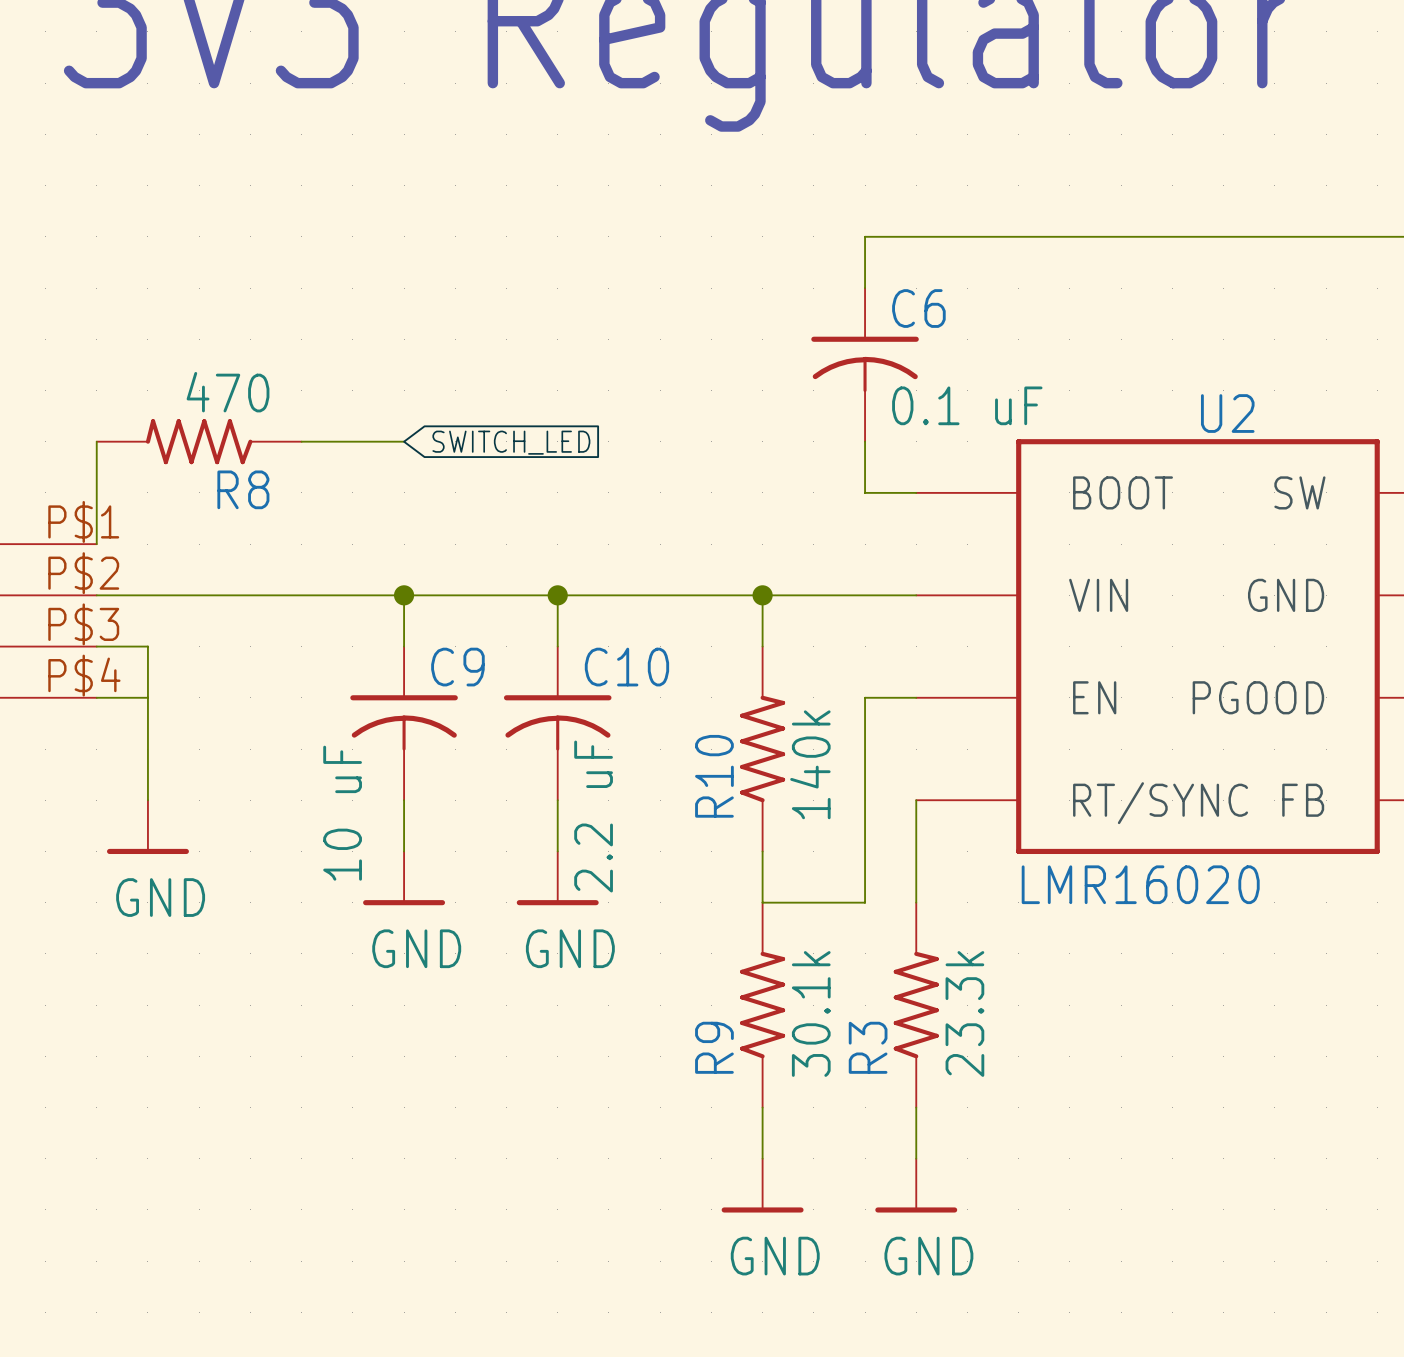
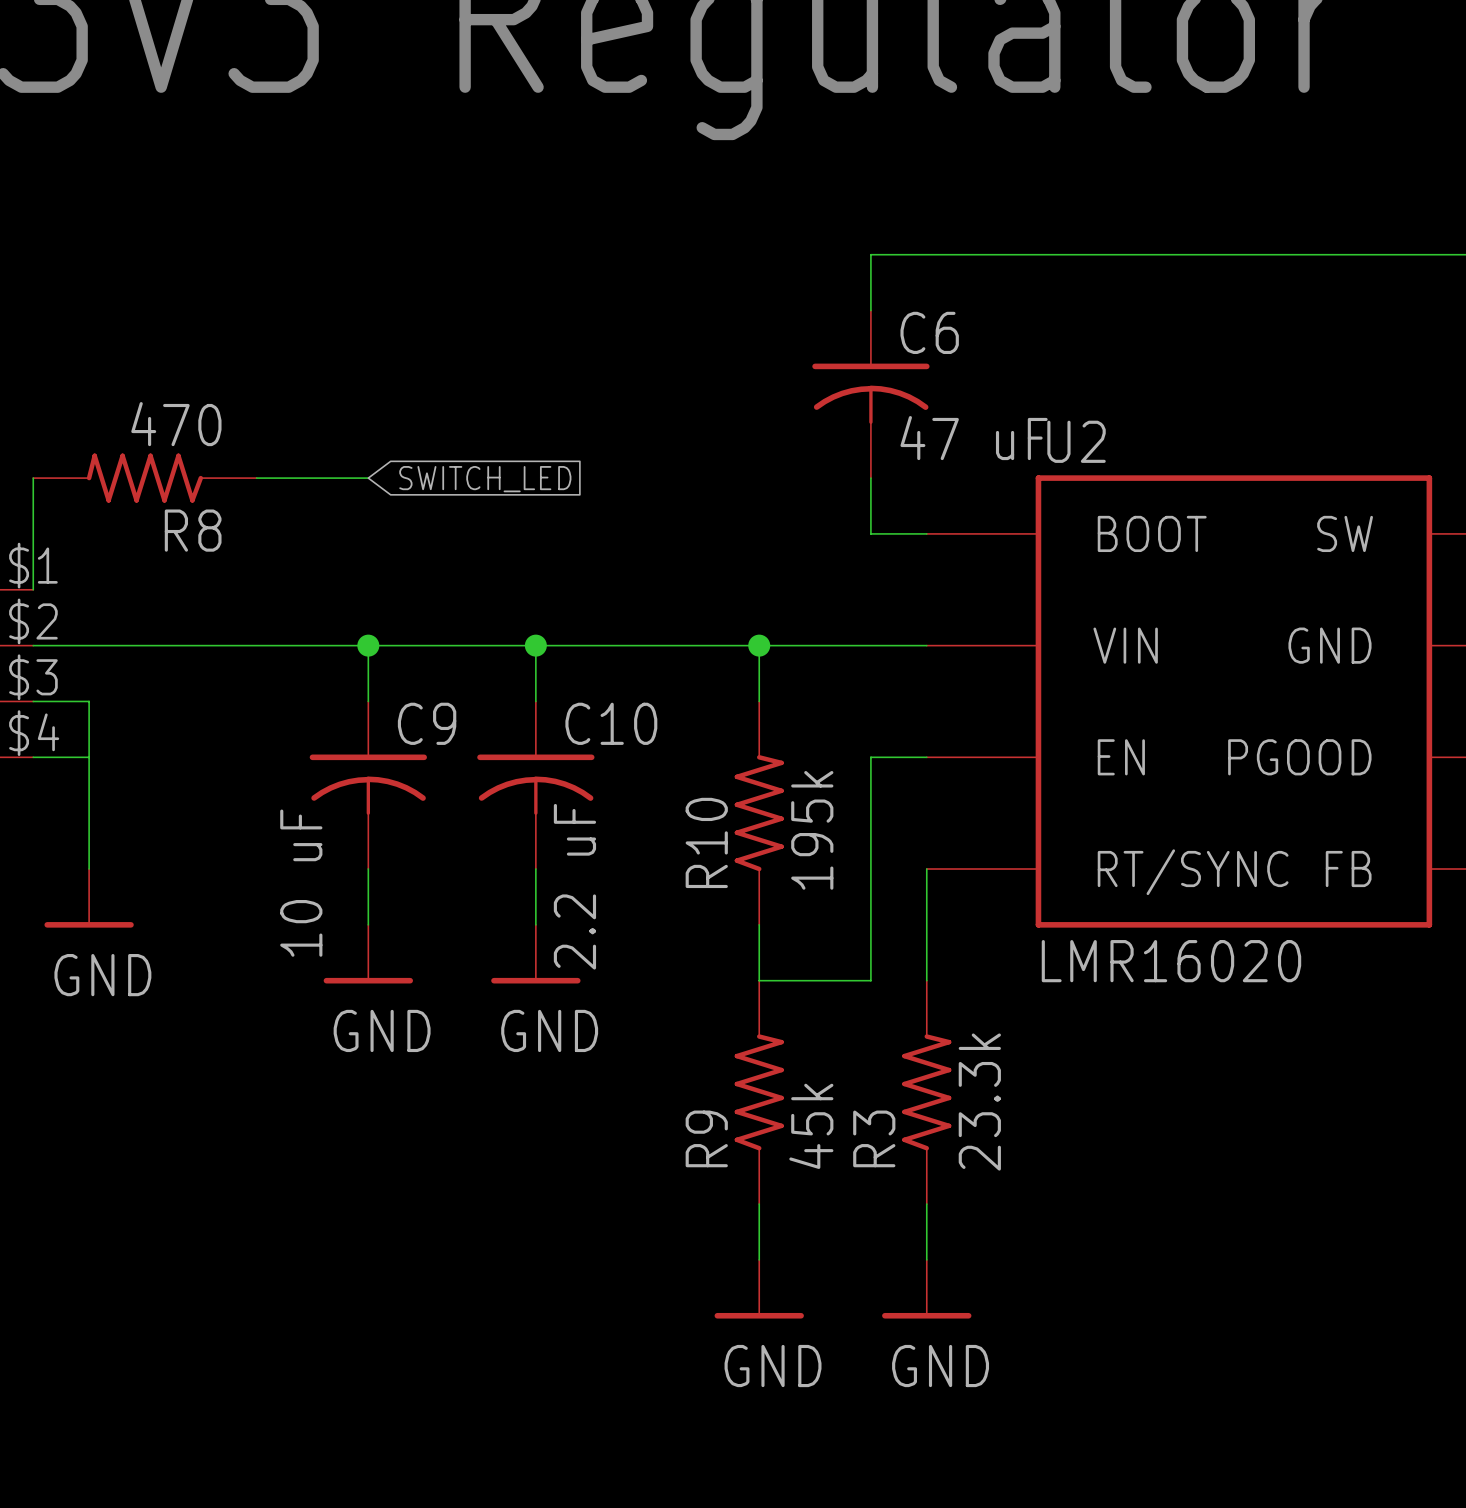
C6 value: 0.1 uF (967, 405) -> 47 uF (974, 438)
U2 name position: U2 (1227, 413) -> U2 (1076, 441)
R10 value: 140k (810, 764) -> 195k (812, 830)
R9 value: 30.1k (811, 1013) -> 45k (811, 1126)

